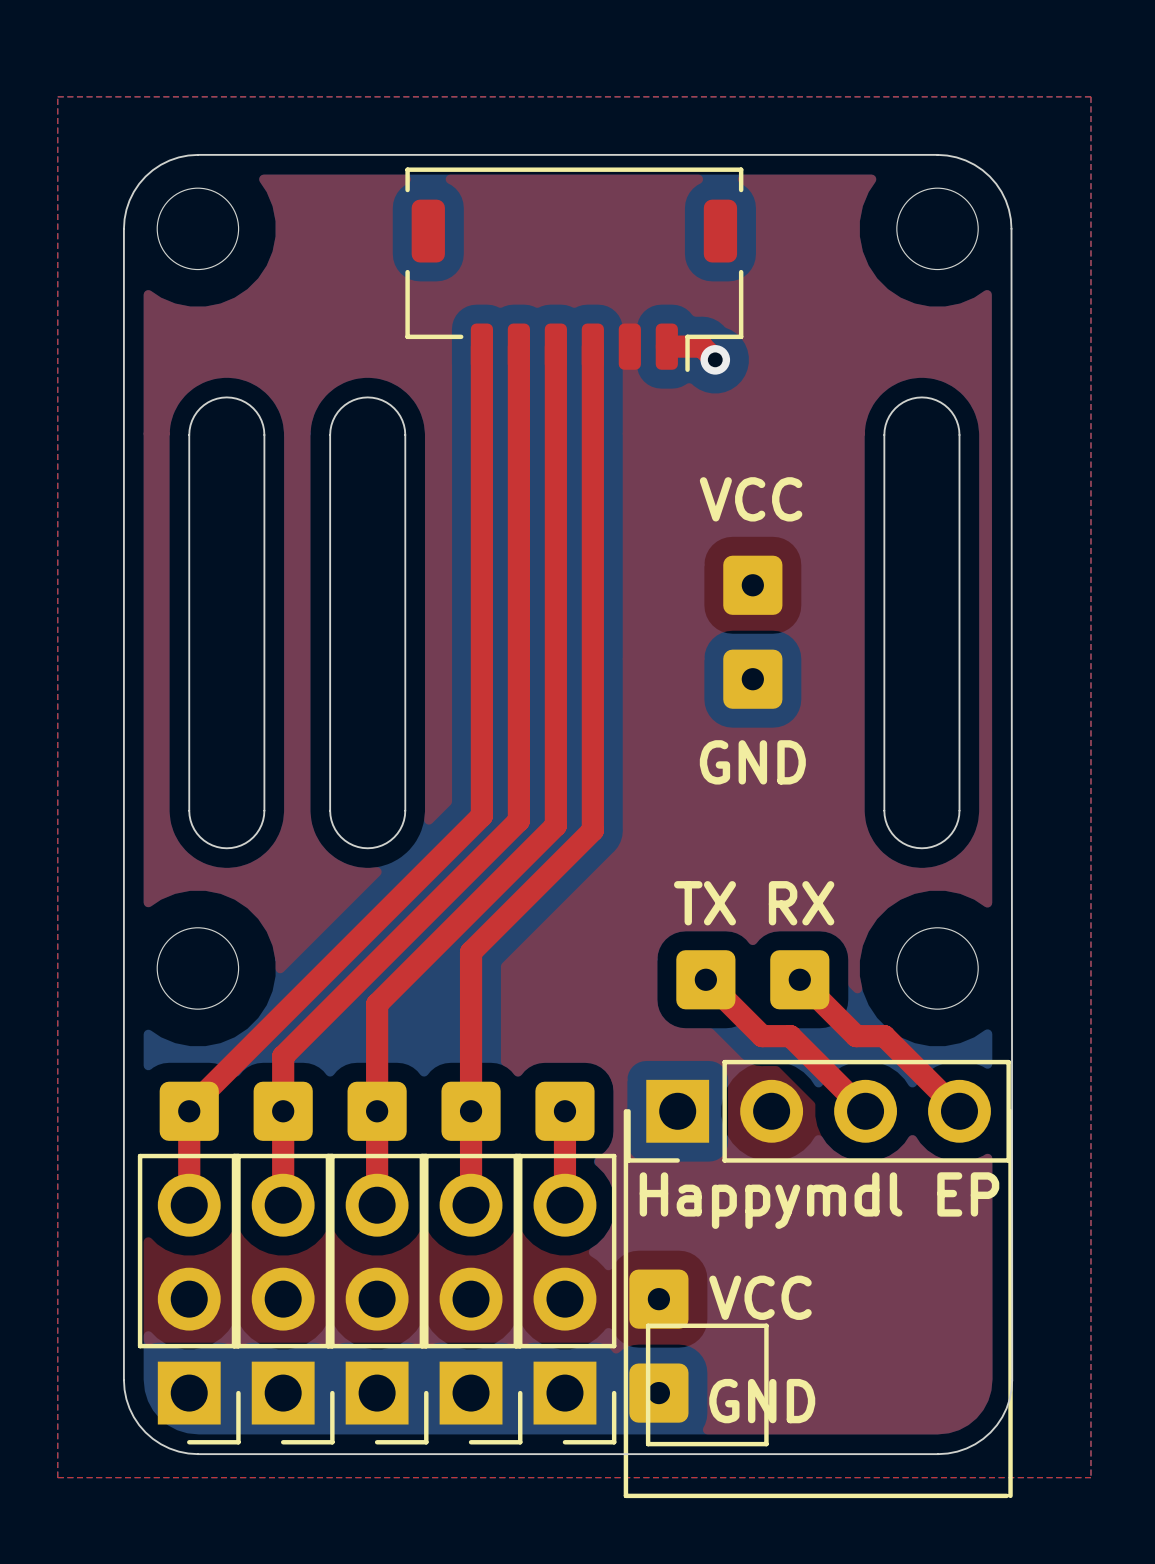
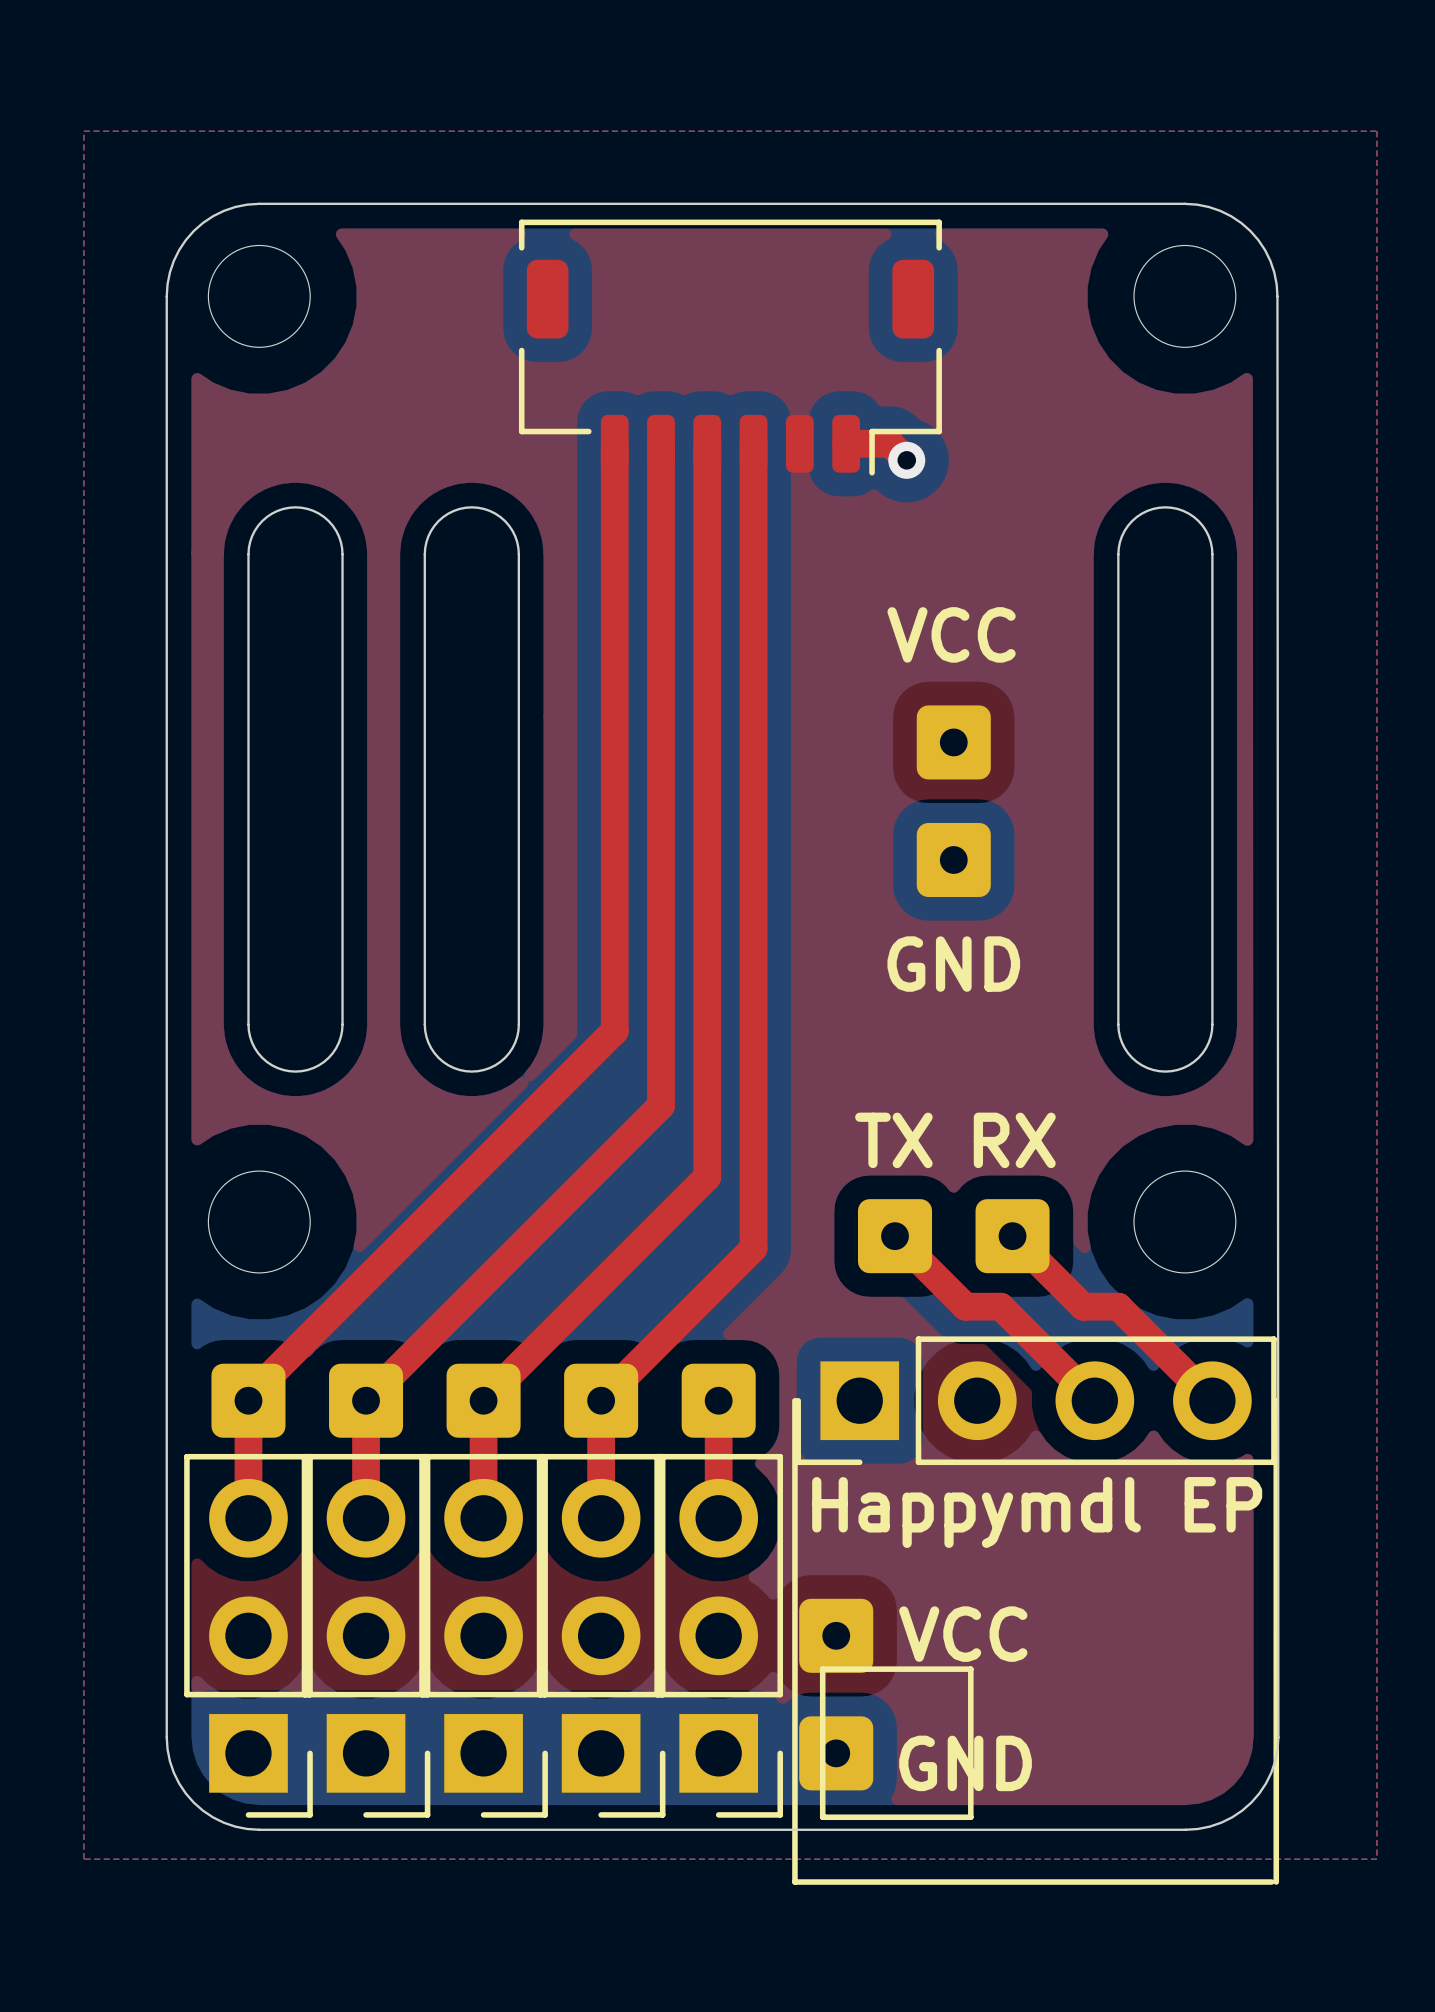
top track: (518, 820) (283, 1056) (283, 1111) -> (661, 1037) (661, 1105) (366, 1400)
top track: (555, 825) (377, 1004) (377, 1111) -> (707, 1043) (707, 1177) (483, 1400)
top track: (592, 830) (471, 952) (471, 1111) -> (753, 1049) (753, 1248) (601, 1400)

